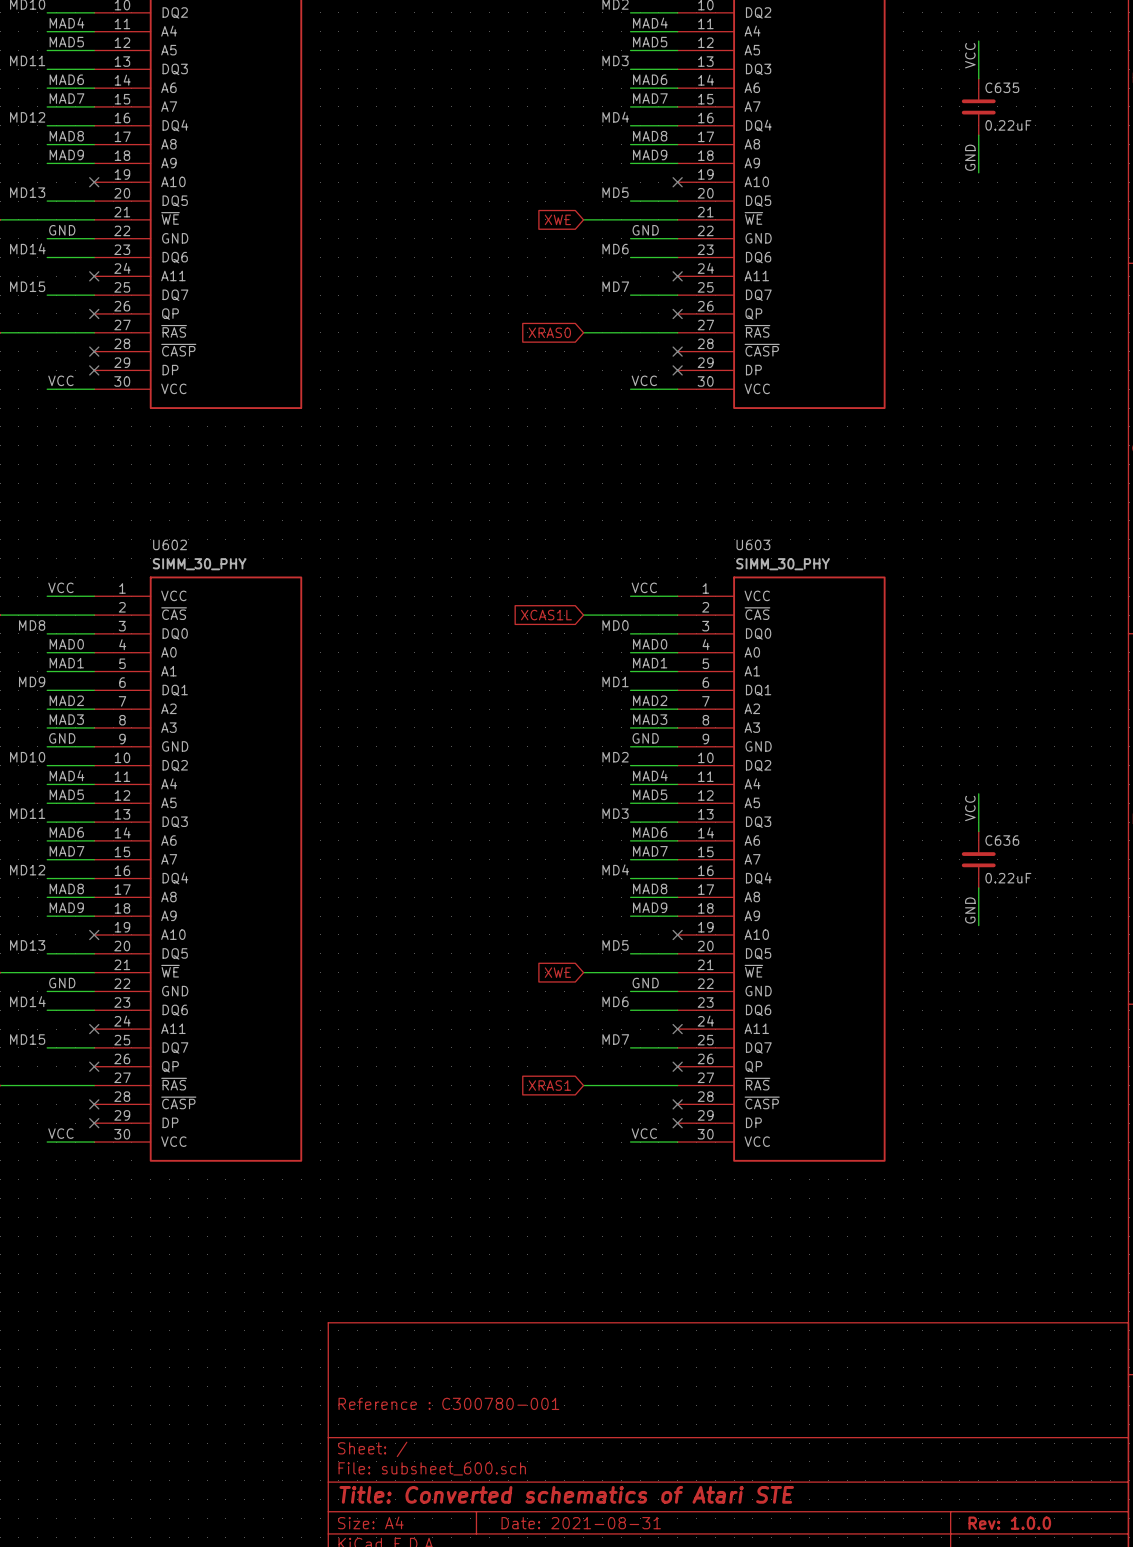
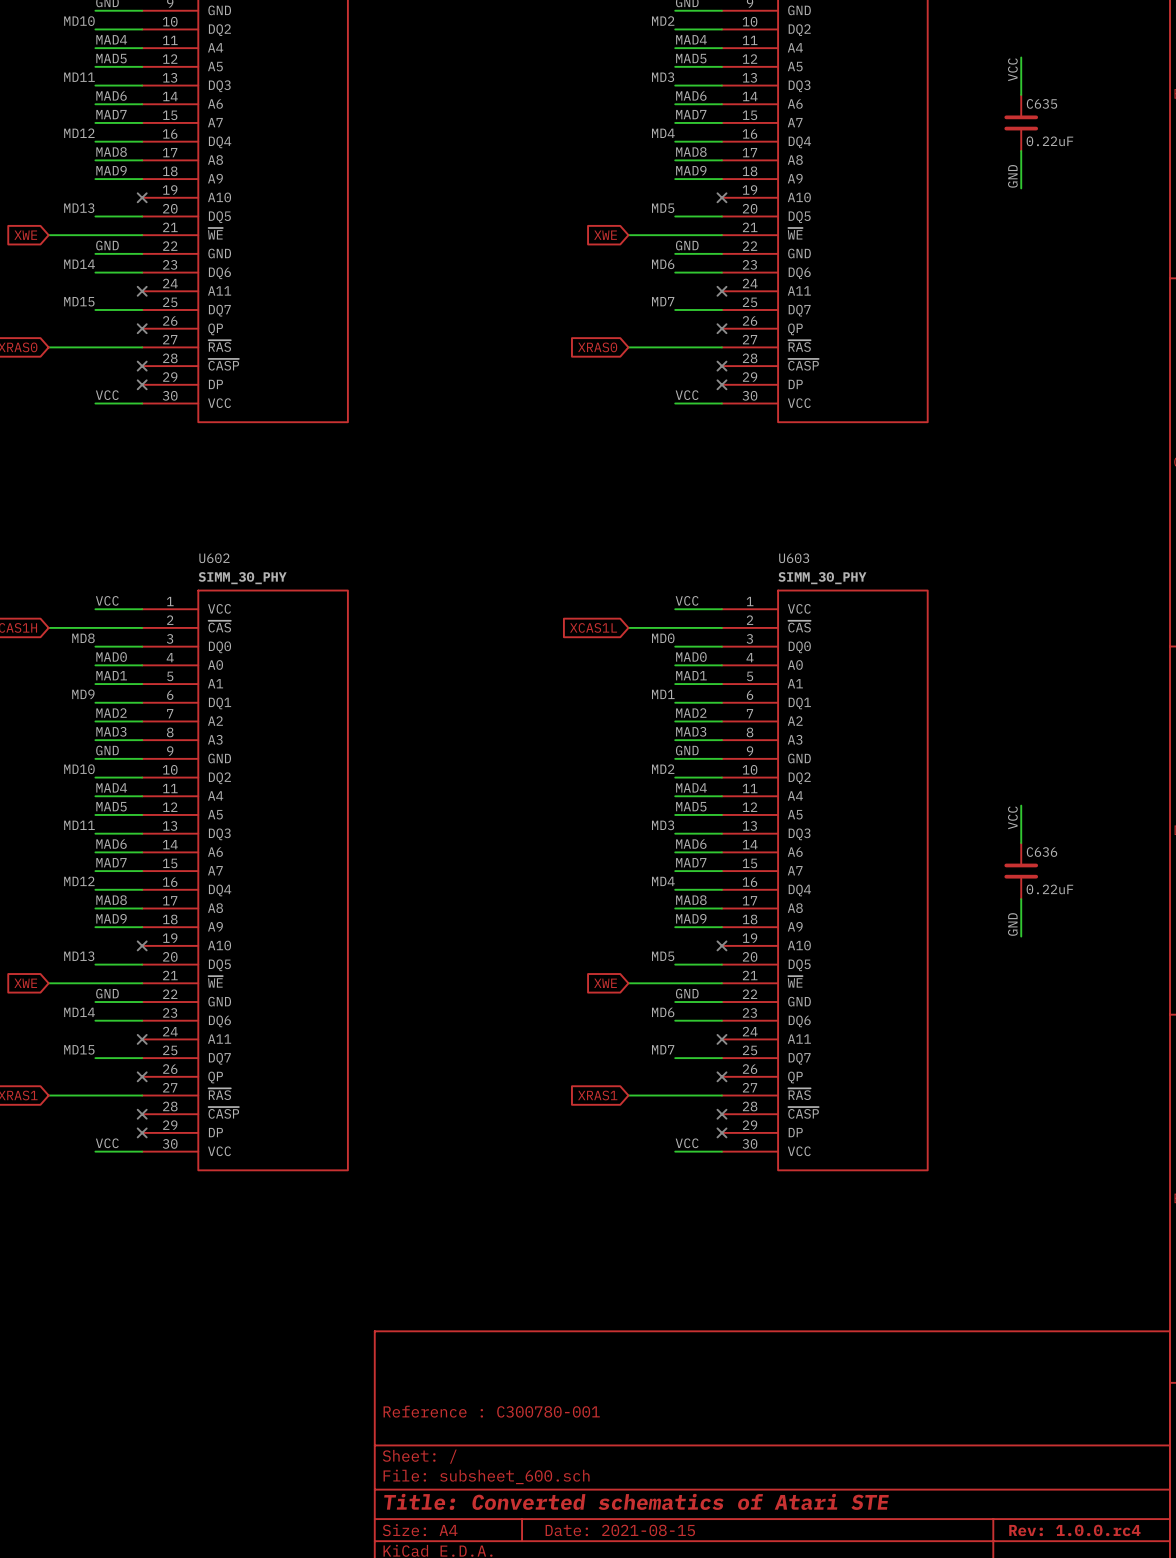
title block: Date: 2021-08-31 (581, 1523) -> Date: 2021-08-15 (620, 1530)
title block: Rev: 1.0.0 (1009, 1523) -> Rev: 1.0.0.rc4 (1074, 1530)

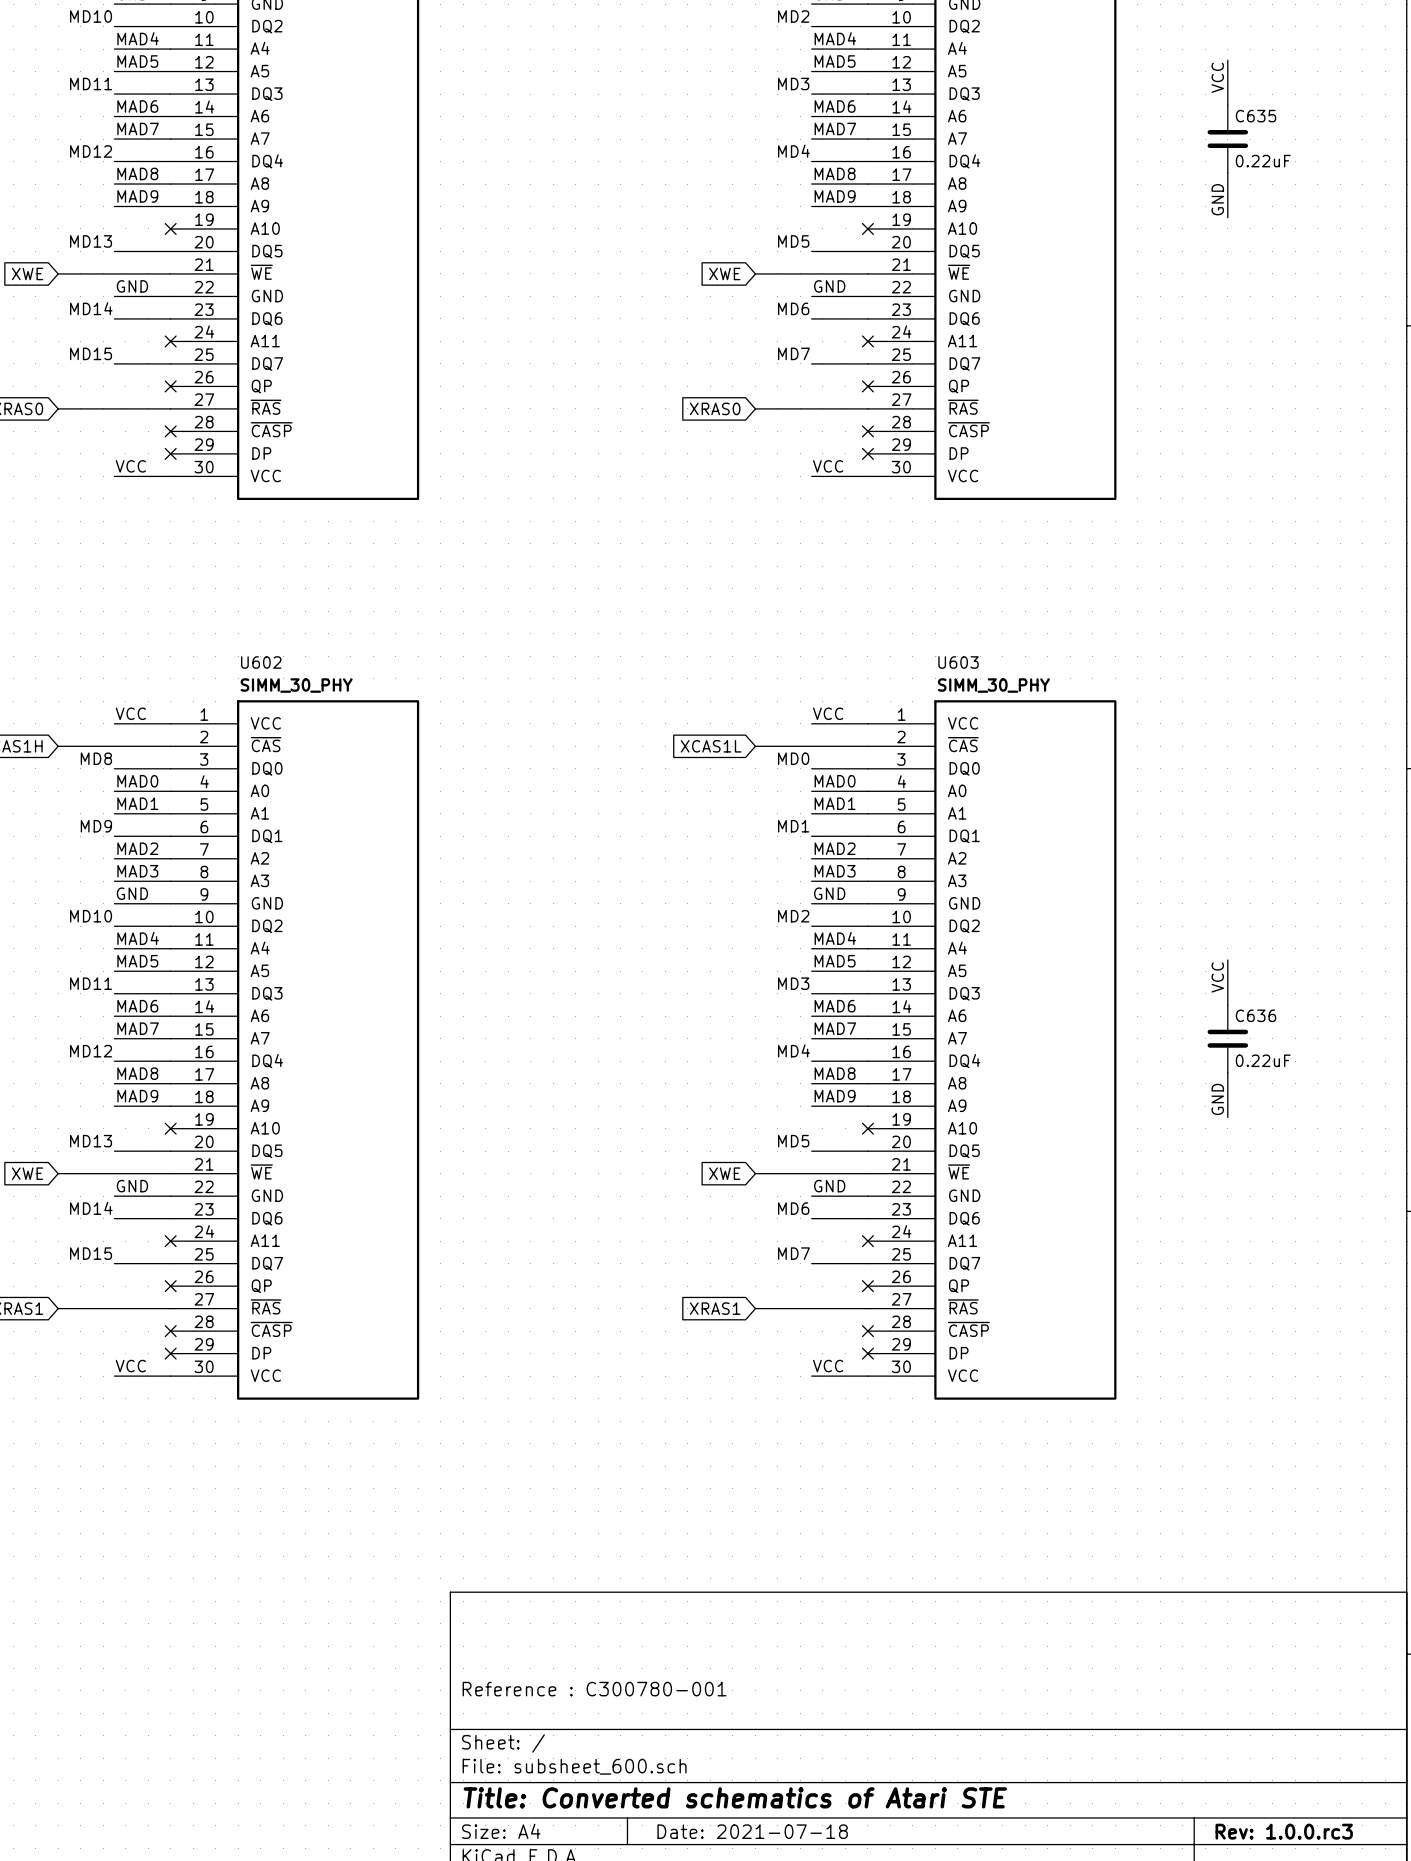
title block: Date: 2021-08-15 (620, 1530) -> Date: 2021-07-18 (752, 1831)
title block: Rev: 1.0.0.rc4 (1074, 1530) -> Rev: 1.0.0.rc3 (1284, 1831)

